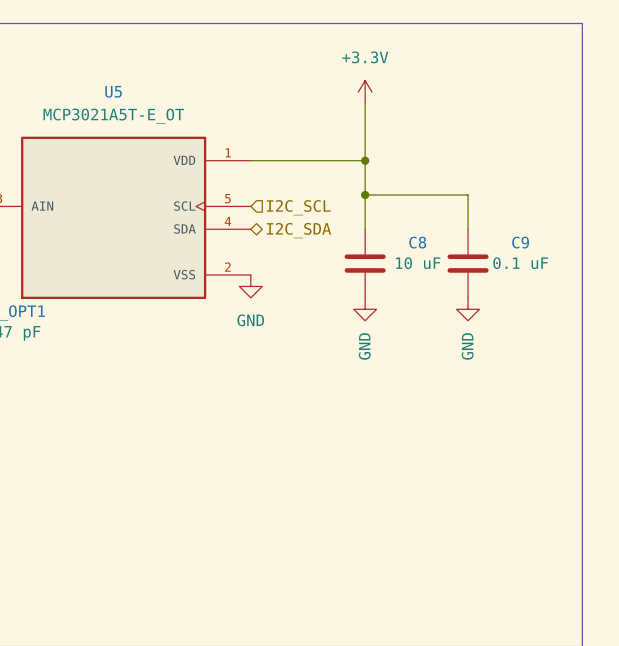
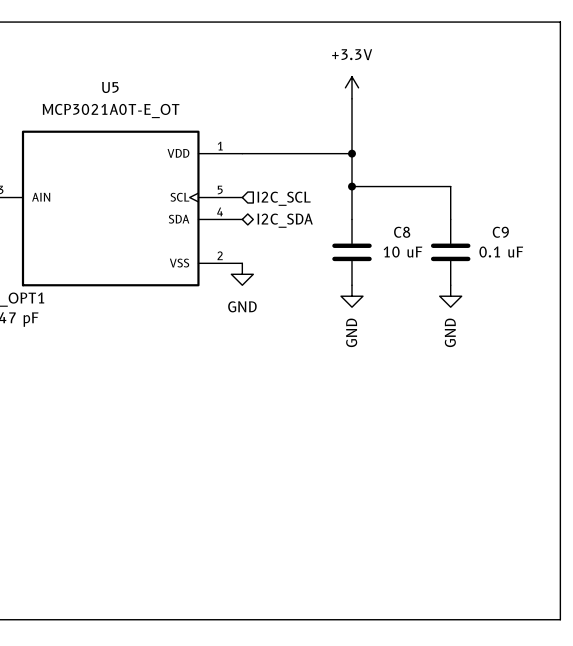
U5 value: MCP3021A5T-E_OT (113, 116) -> MCP3021A0T-E_OT (111, 111)

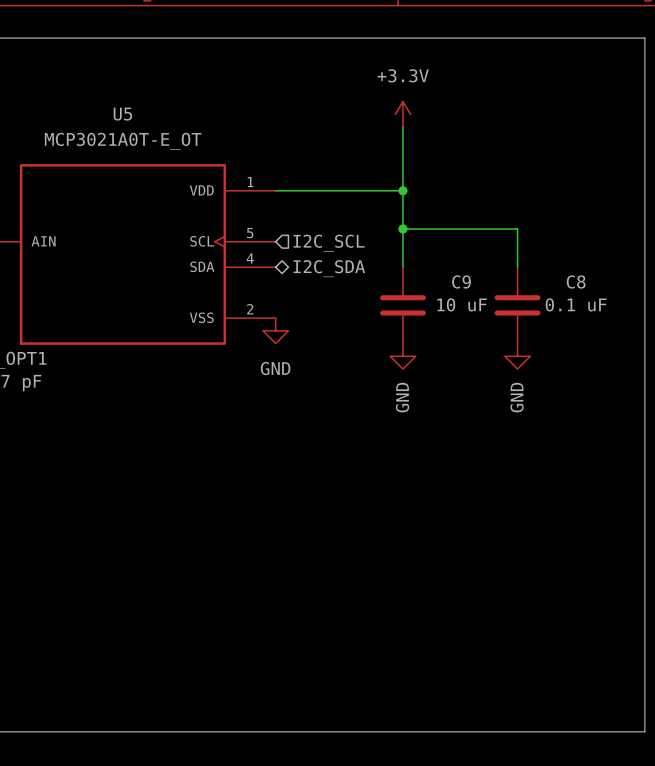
C8 name: C8 (402, 232) -> C9 (461, 281)
C9 name: C9 (500, 232) -> C8 (576, 281)

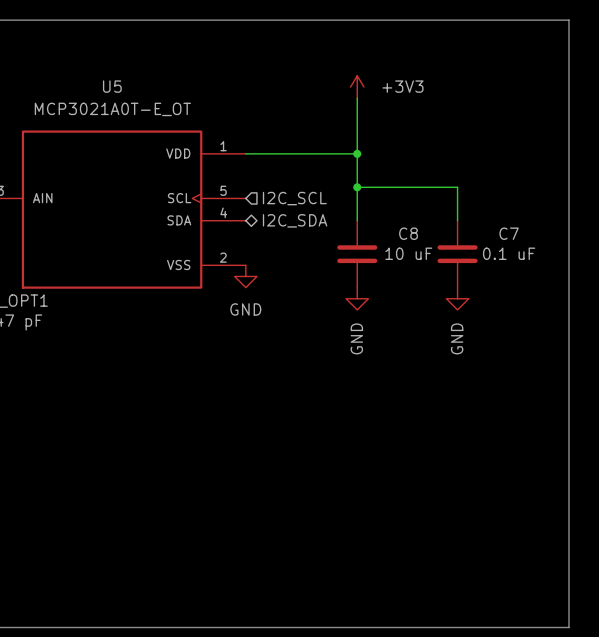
power symbol: +3.3V (402, 114) -> +3V3 (357, 87)
C9 name: C9 (461, 281) -> C8 (408, 233)
C8 name: C8 (576, 281) -> C7 (509, 233)

